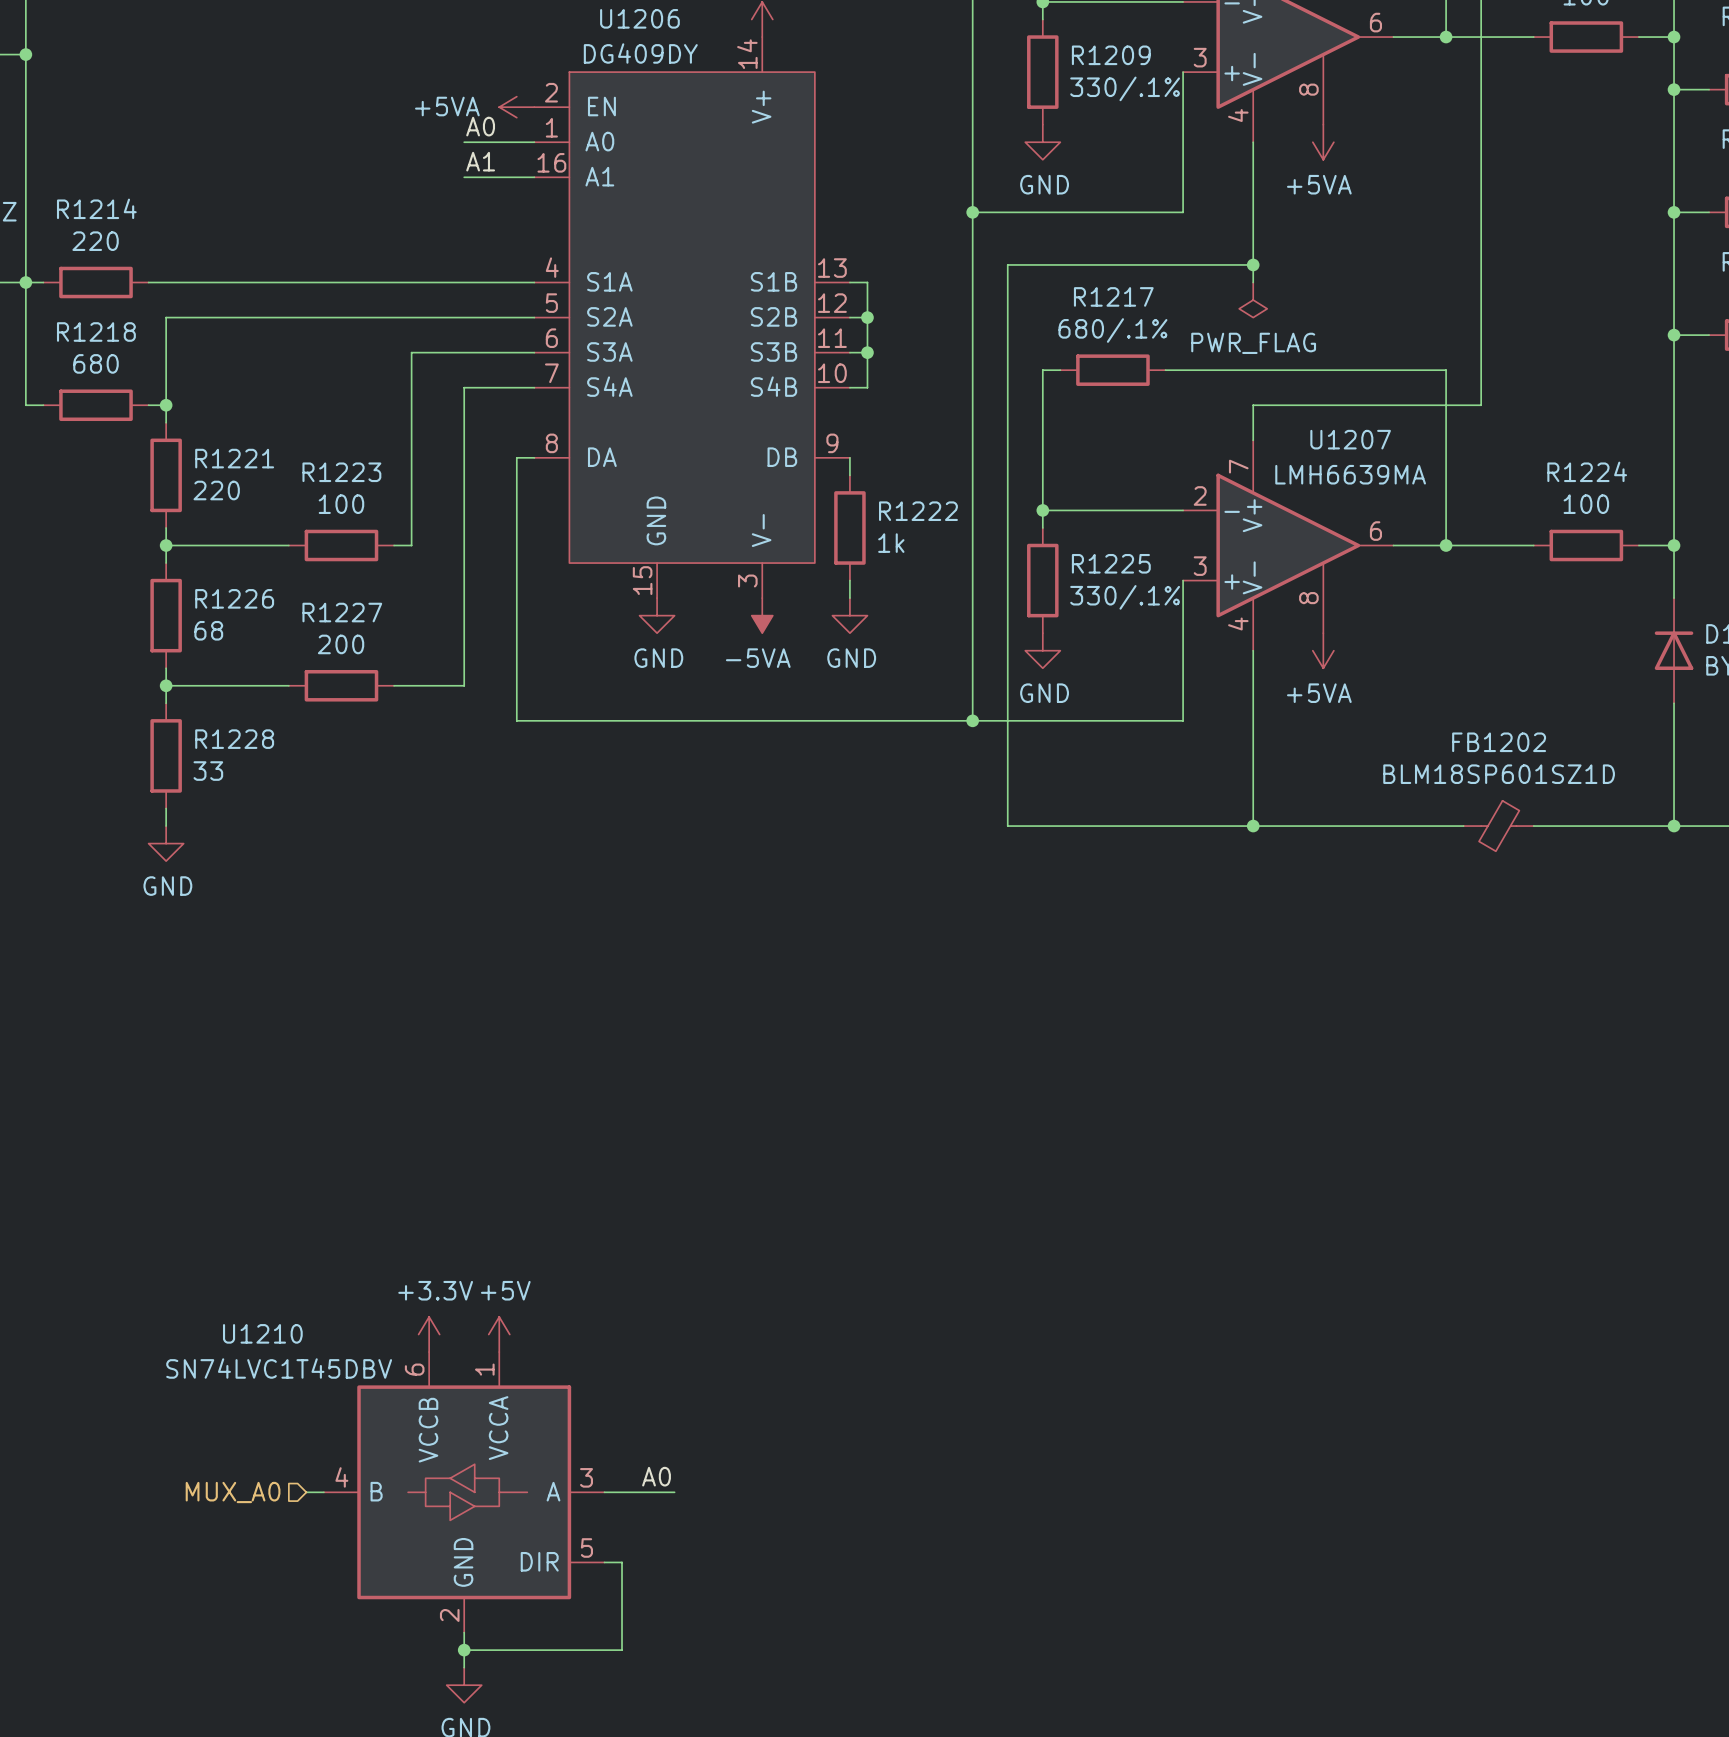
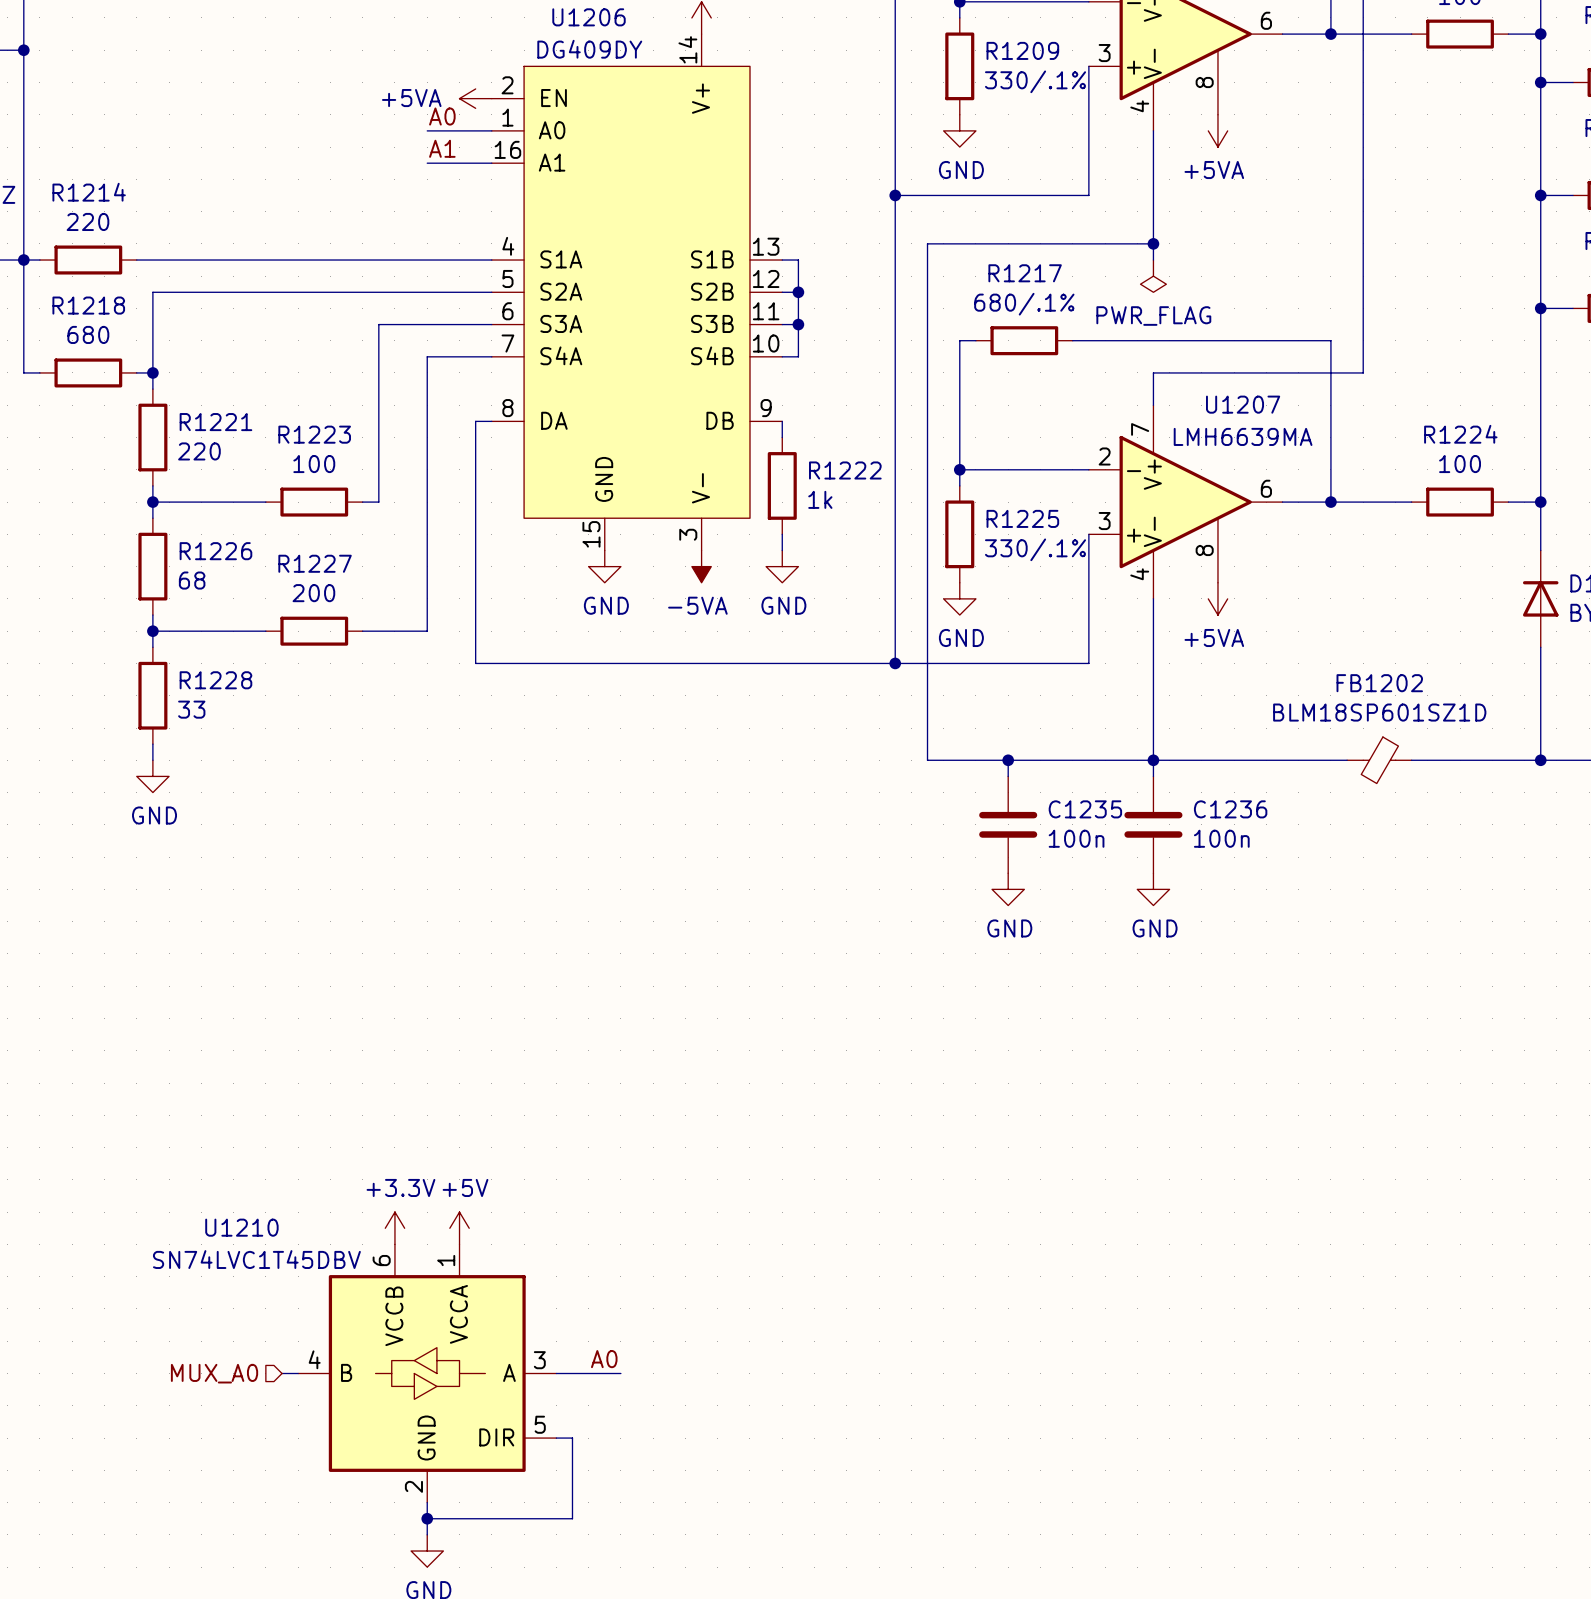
wire: none -> (1008, 760) (1008, 776)
junction: none -> (1008, 760)
wire: none -> (1153, 760) (1153, 776)
C1235: none -> 100n (1008, 824)
C1236: none -> 100n (1153, 824)
power symbol: none -> GND (1008, 889)
power symbol: none -> GND (1153, 889)

